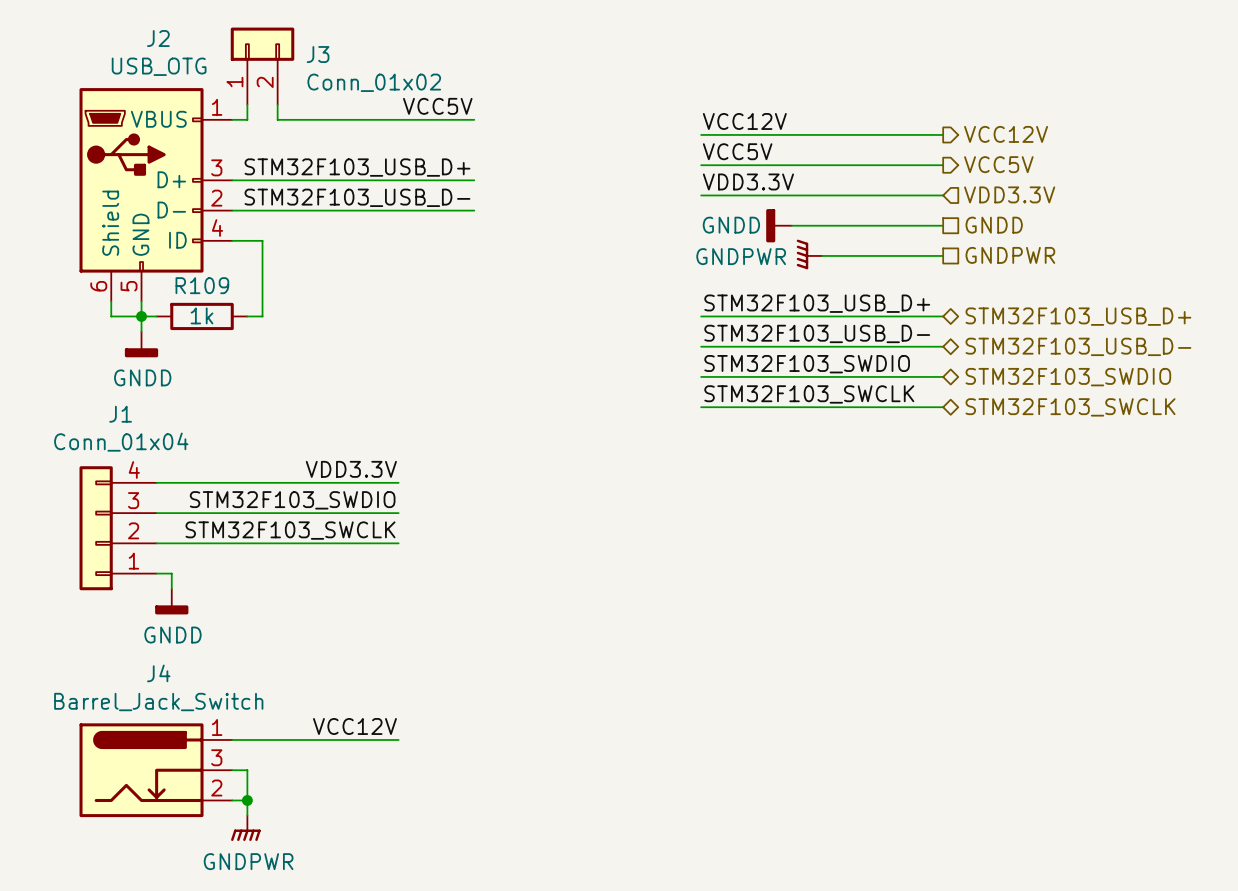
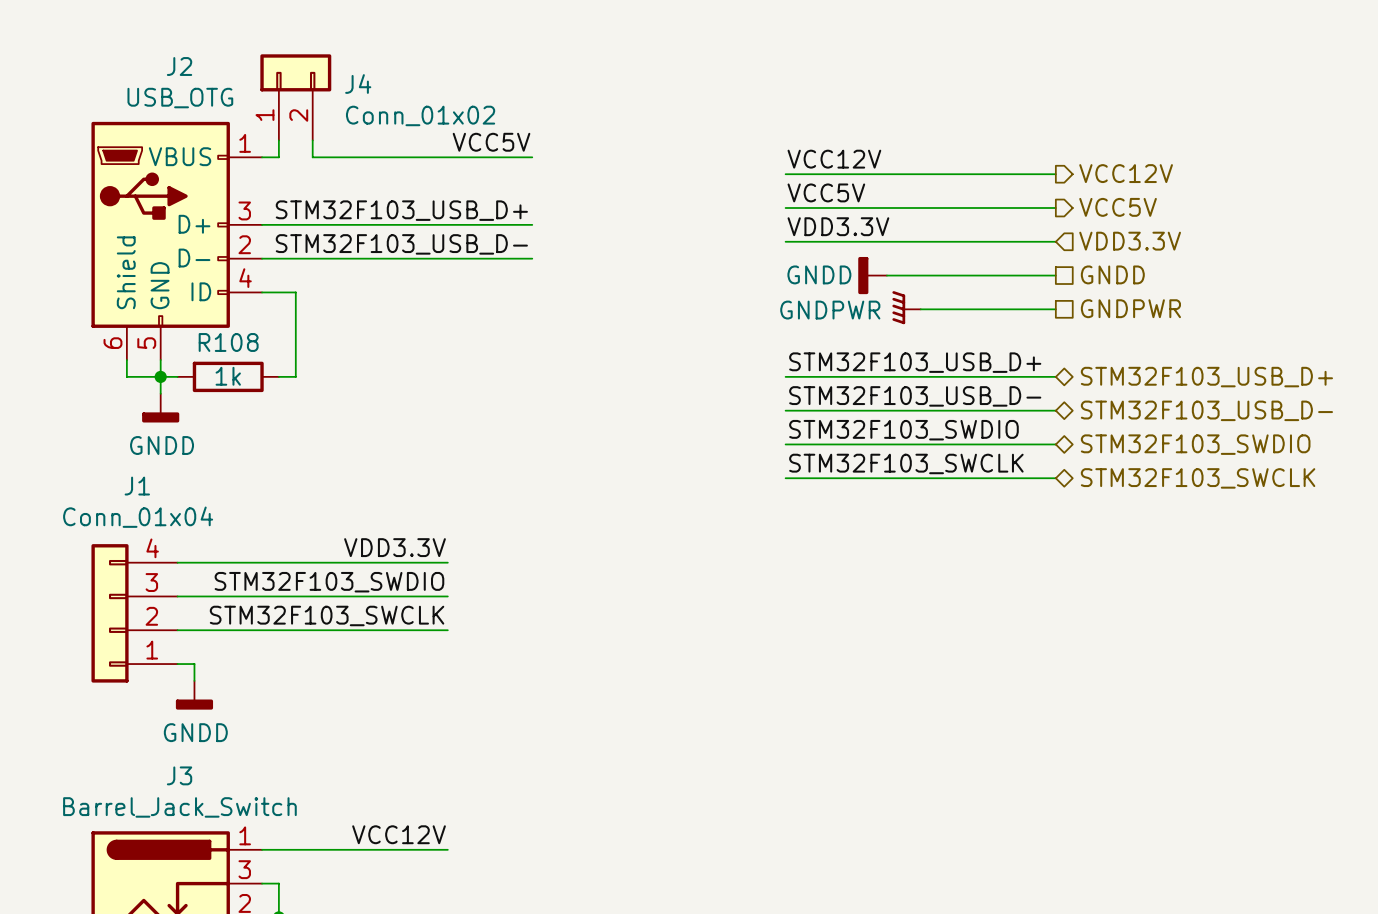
J3 name: J3 (318, 54) -> J4 (358, 84)
R109 name: R109 (202, 285) -> R108 (228, 342)
J4 name: J4 (158, 673) -> J3 (179, 775)

